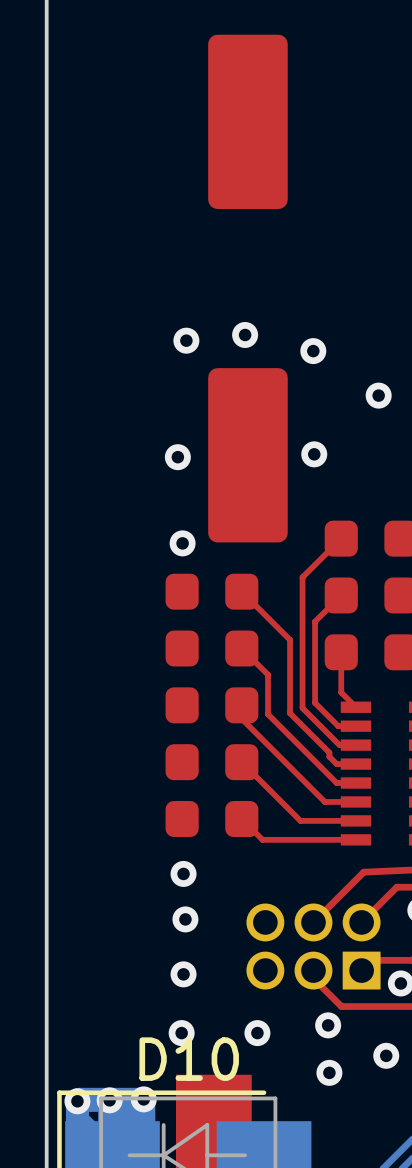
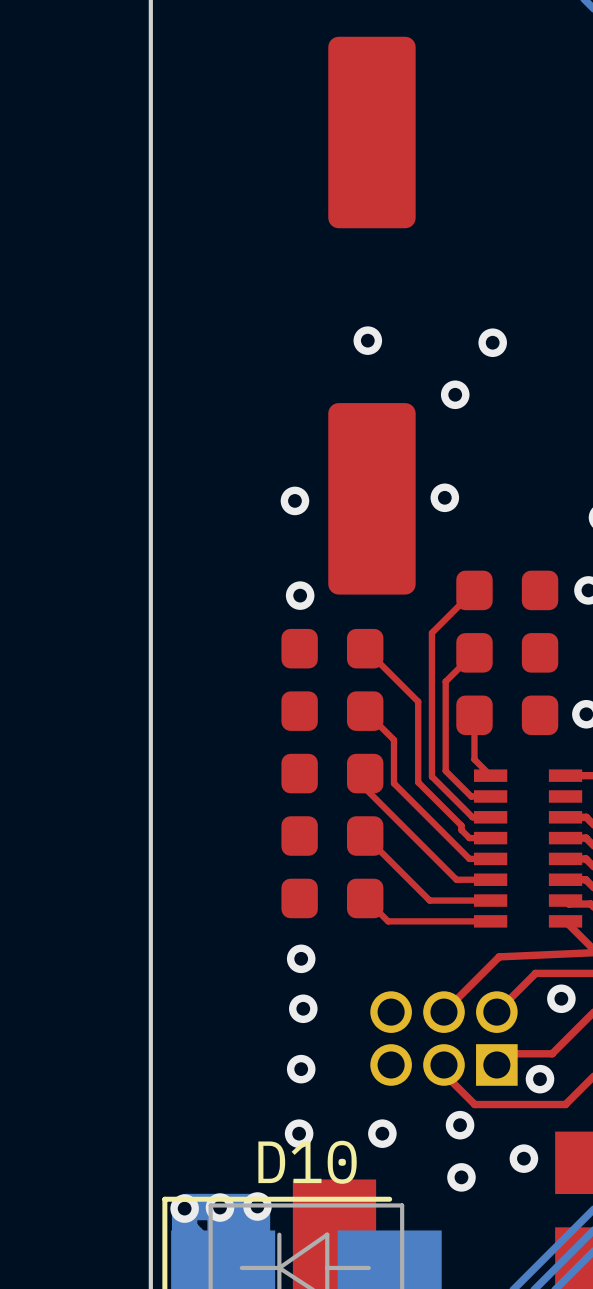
via: none -> (492, 342)
via position: (245, 334) -> (367, 340)
via: (186, 340) -> none
via position: (313, 351) -> (455, 394)
via: (378, 395) -> none

